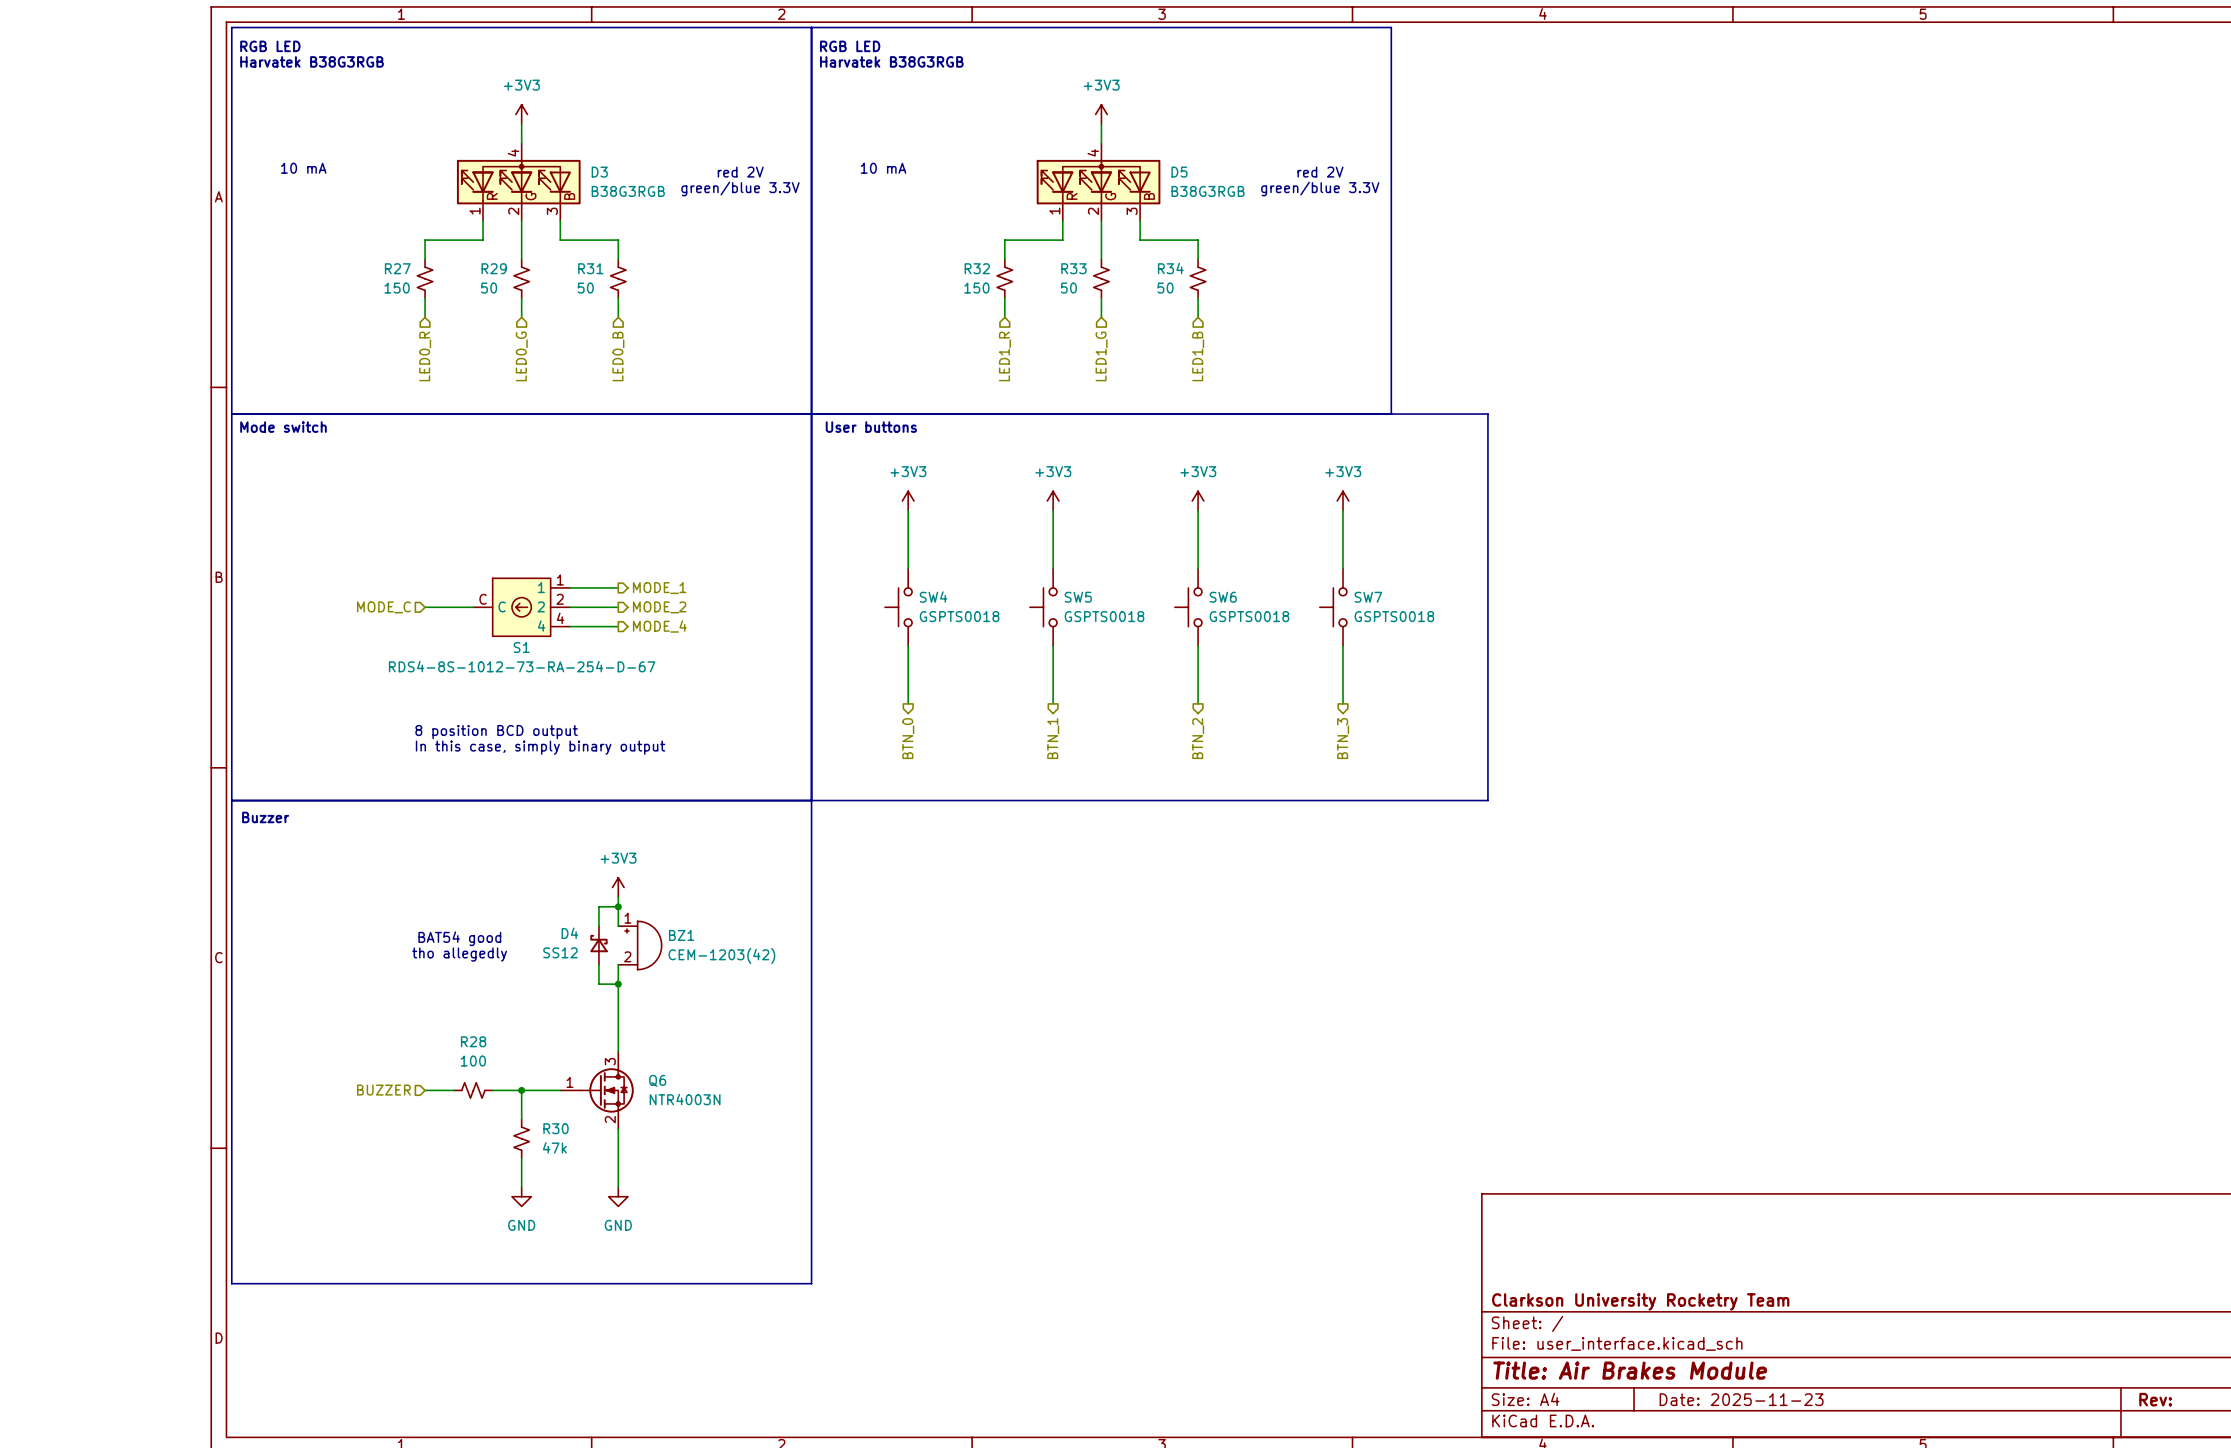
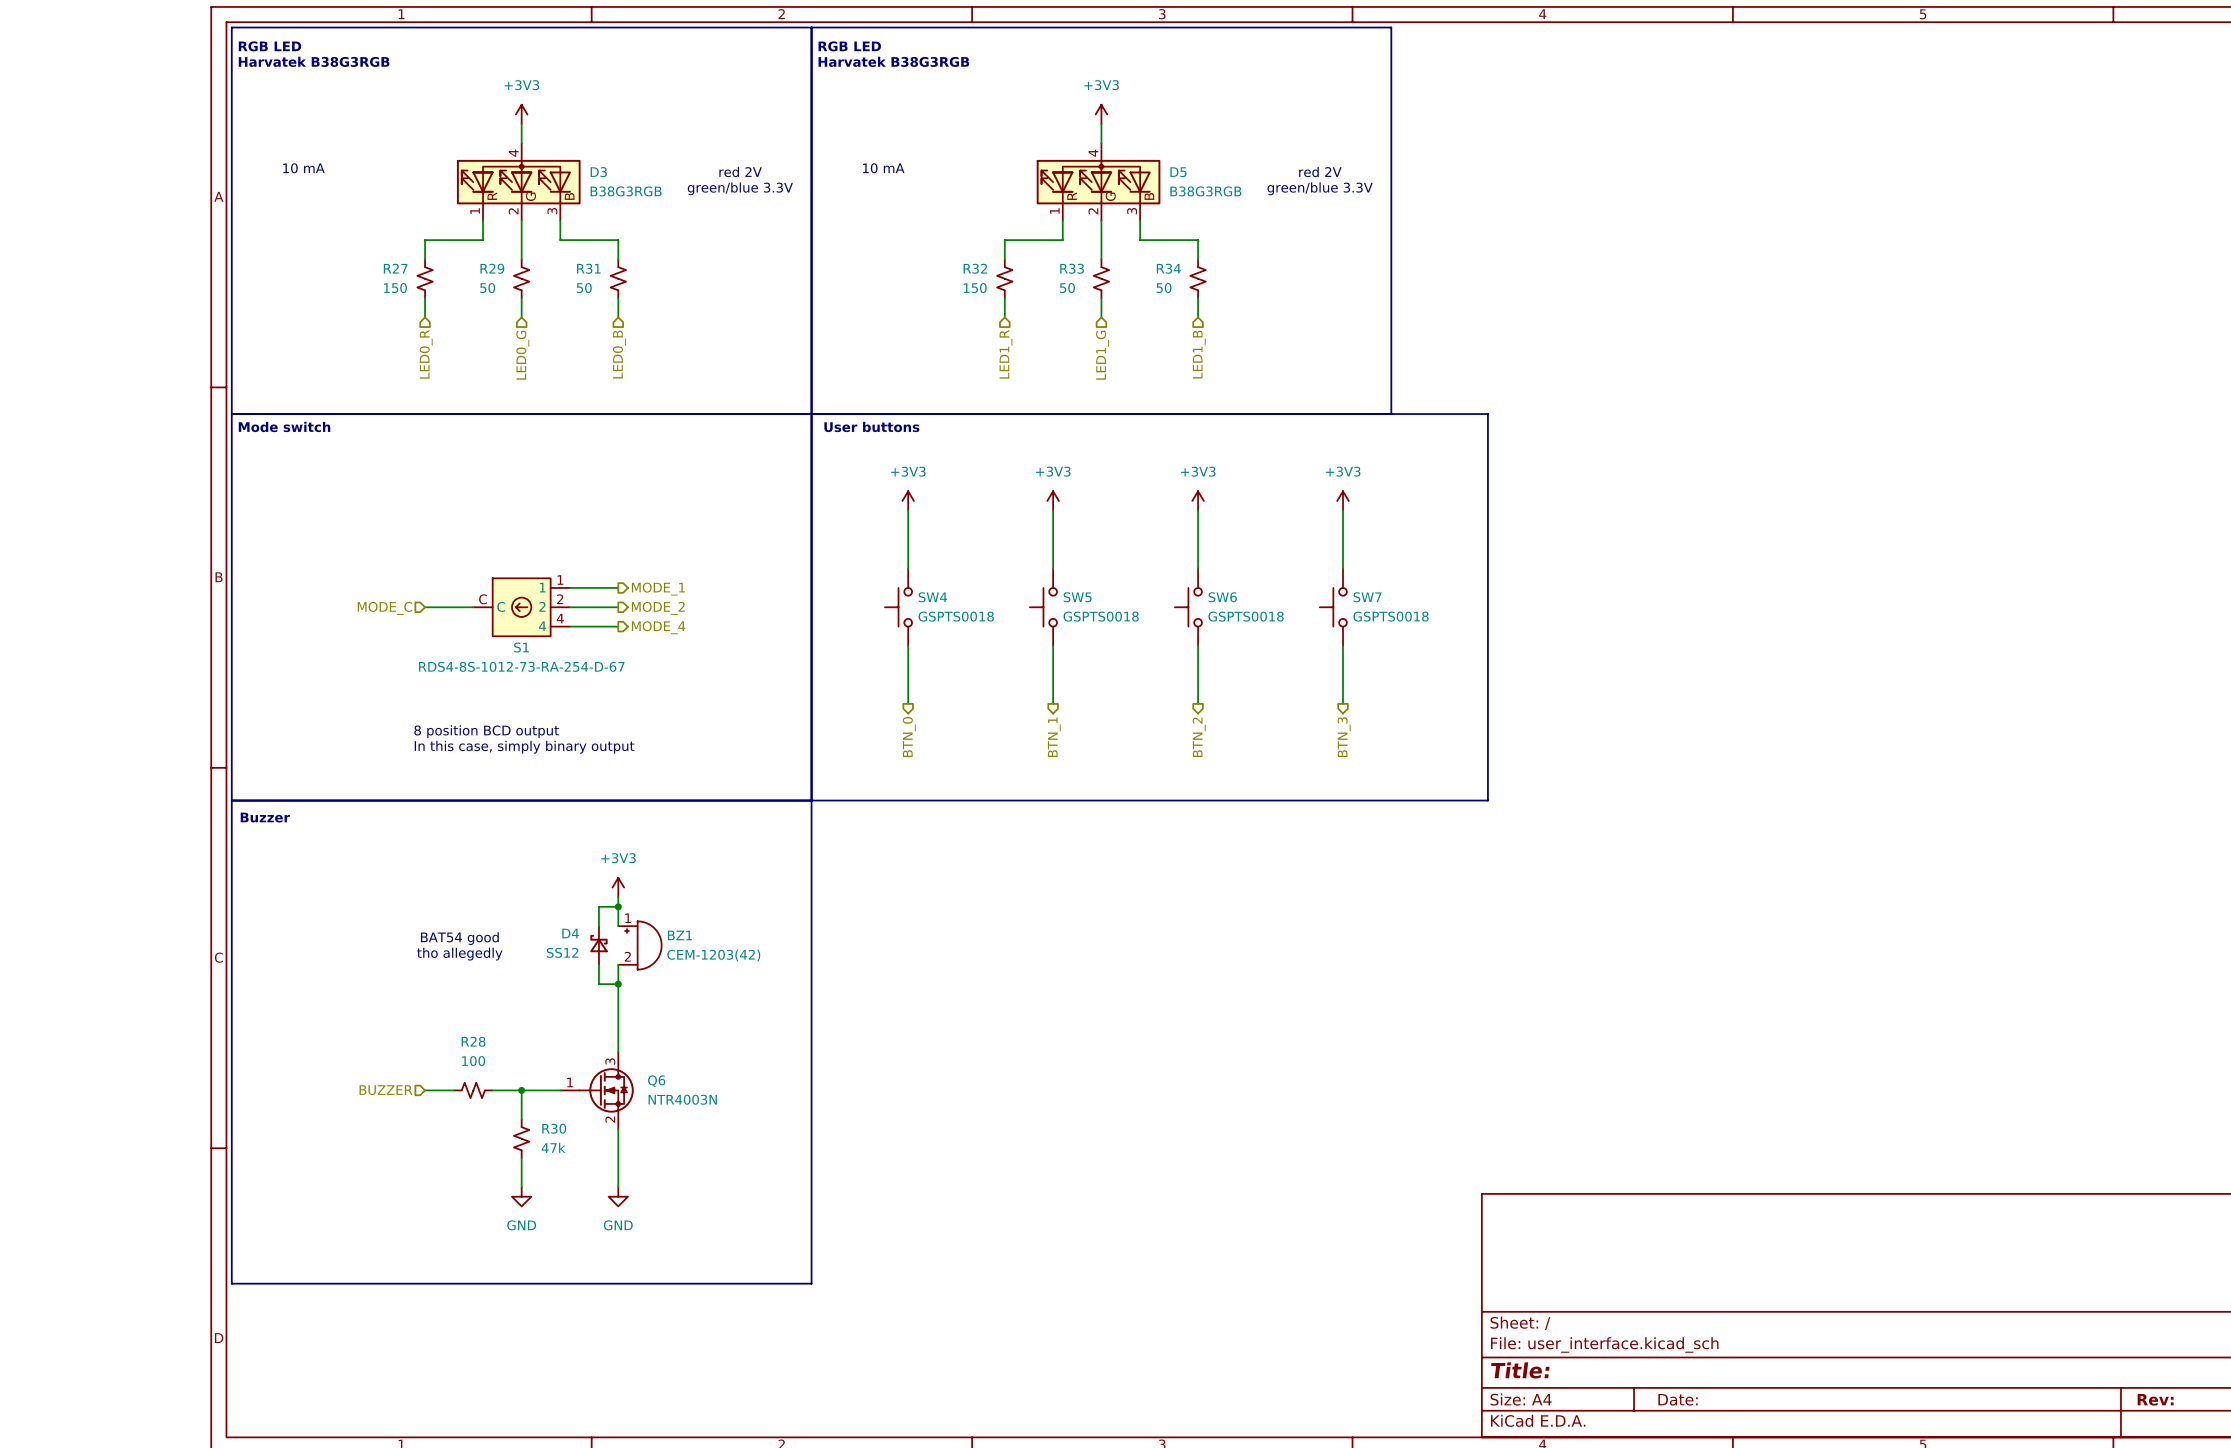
title block: Clarkson University Rocketry Team (1640, 1301) -> none
title block: Title: Air Brakes Module (1630, 1370) -> Title: (1520, 1370)
title block: Date: 2025-11-23 (1741, 1399) -> Date: (1678, 1399)

